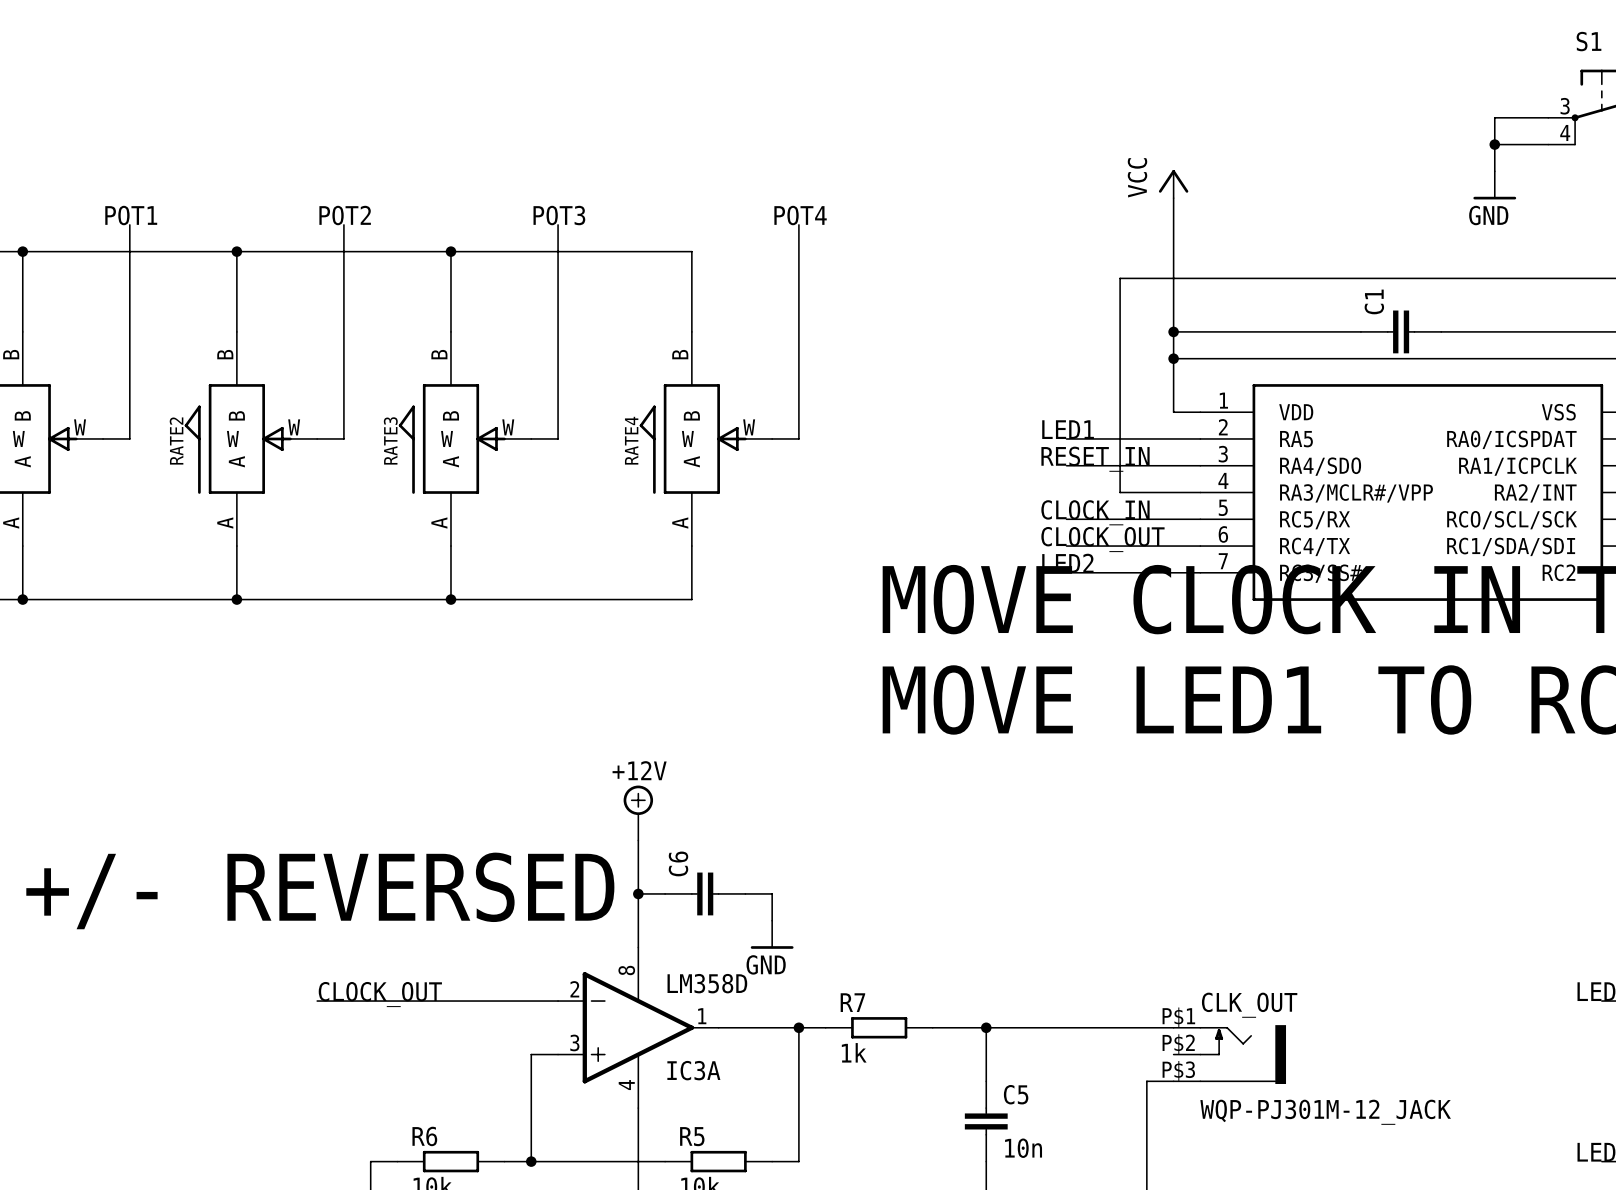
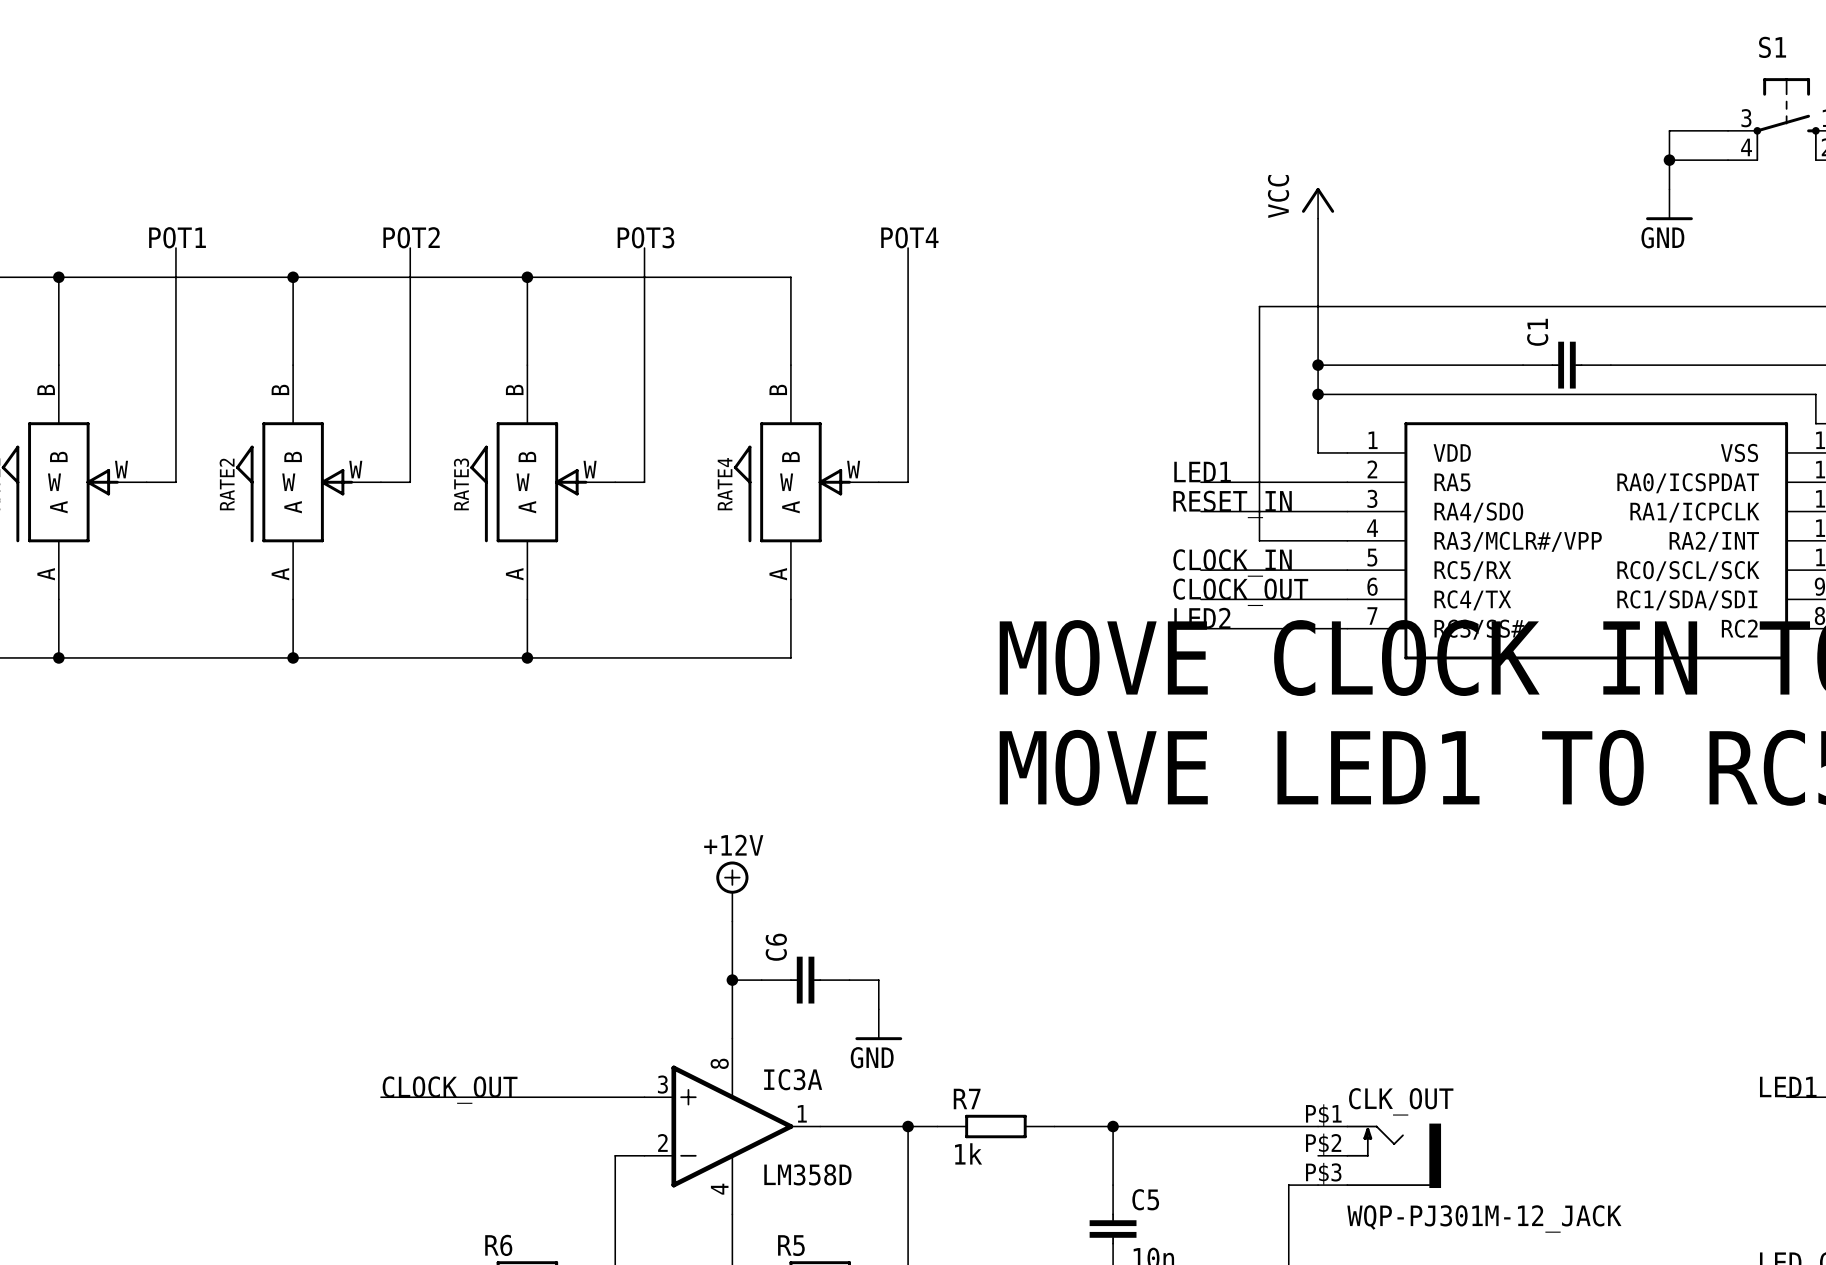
text: +/- REVERSED (320, 890) -> none
IC3A flip: as is (638, 1027) -> up-down (732, 1126)

